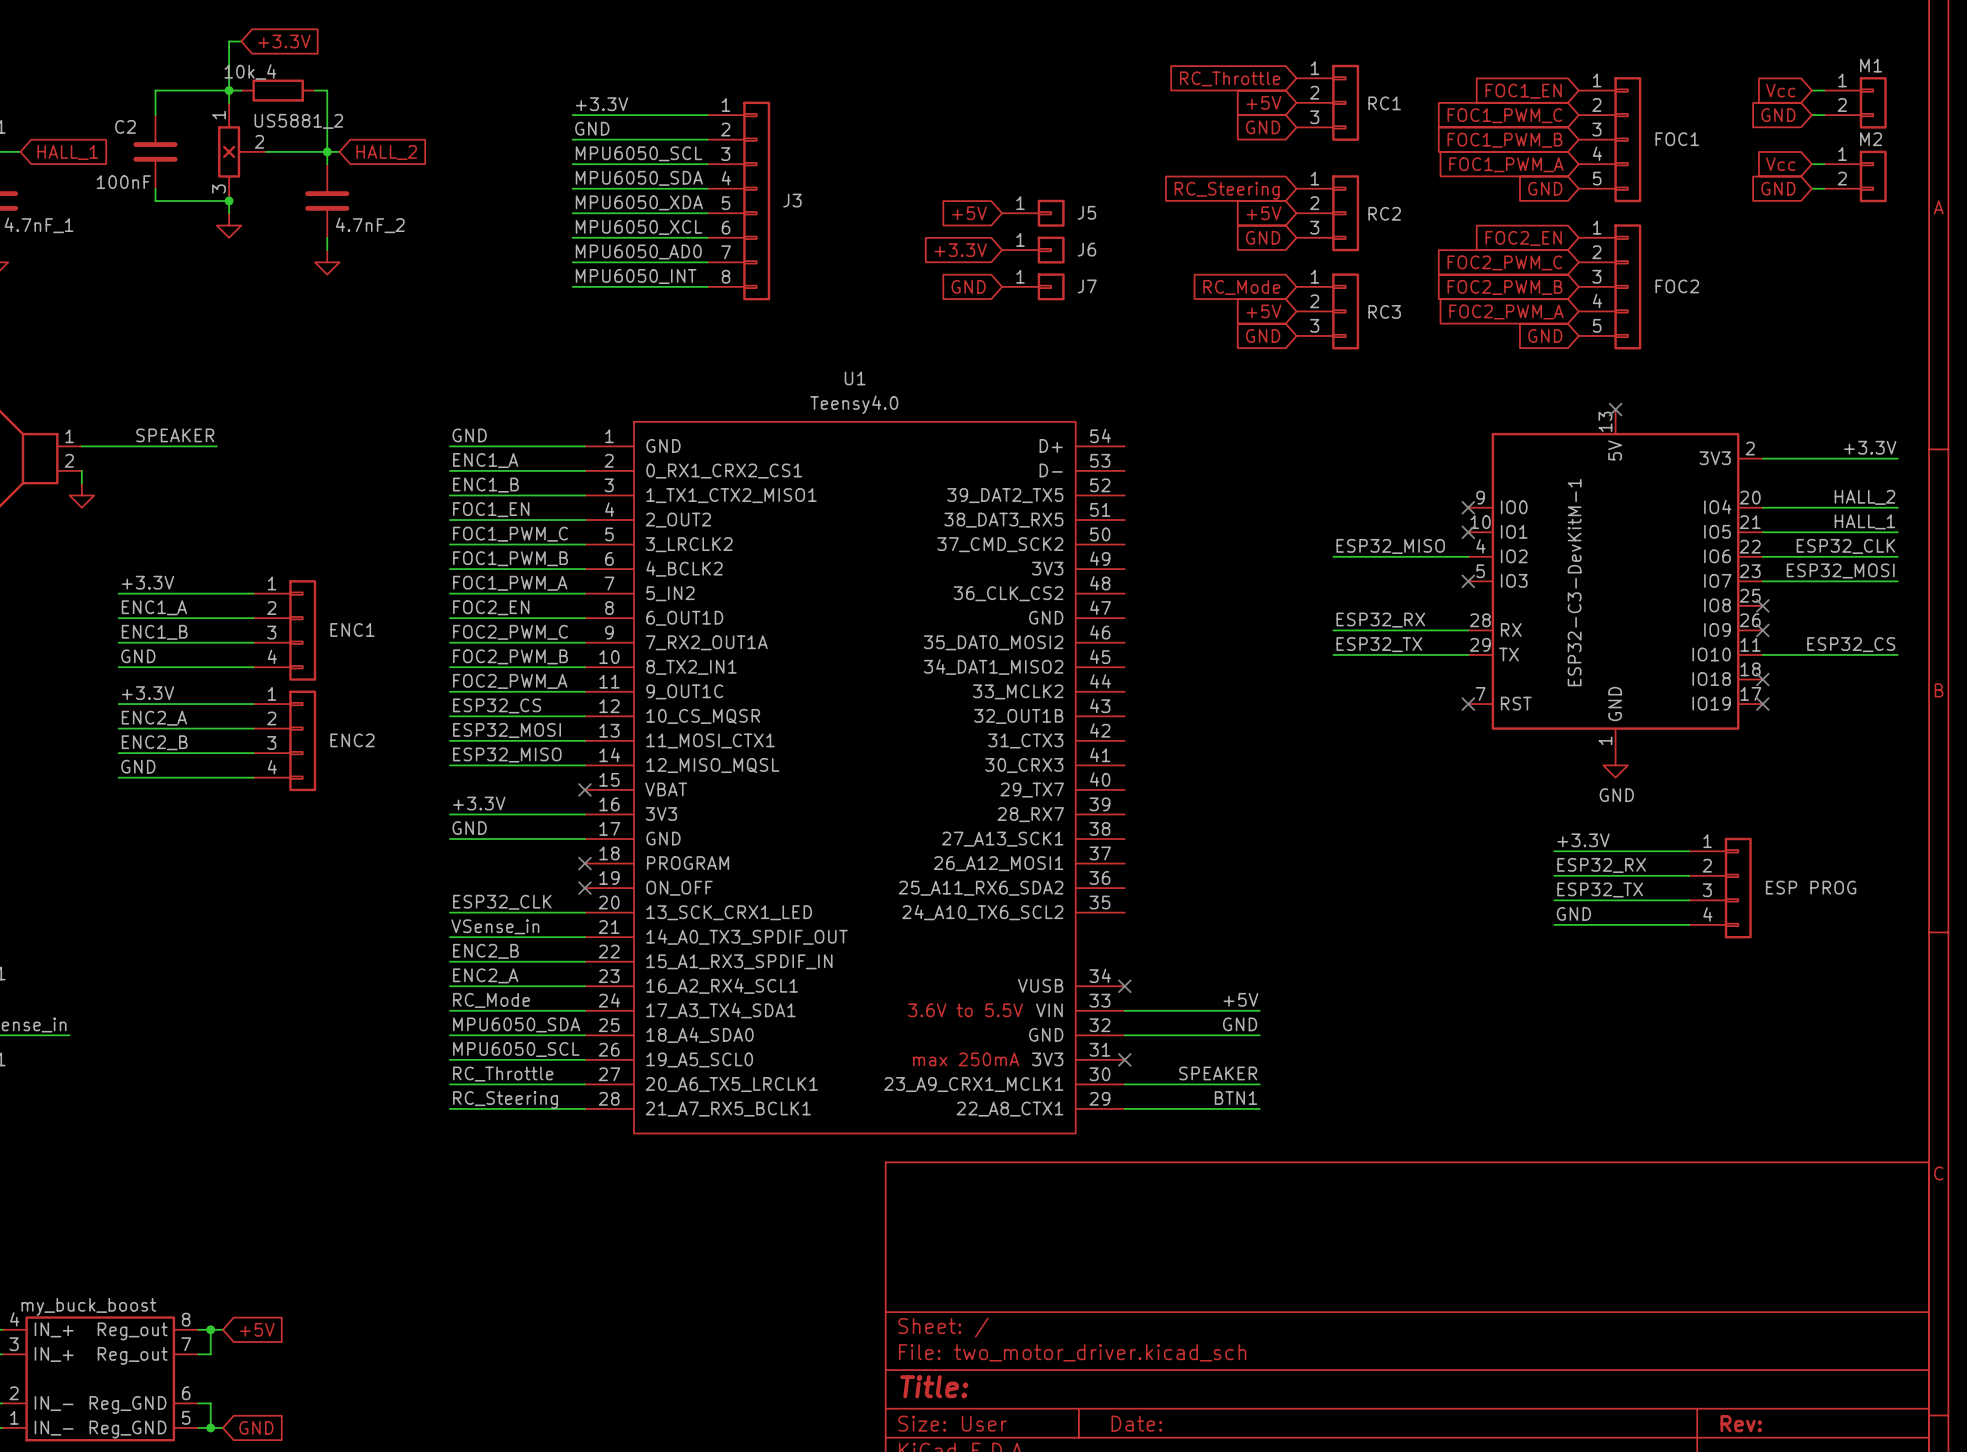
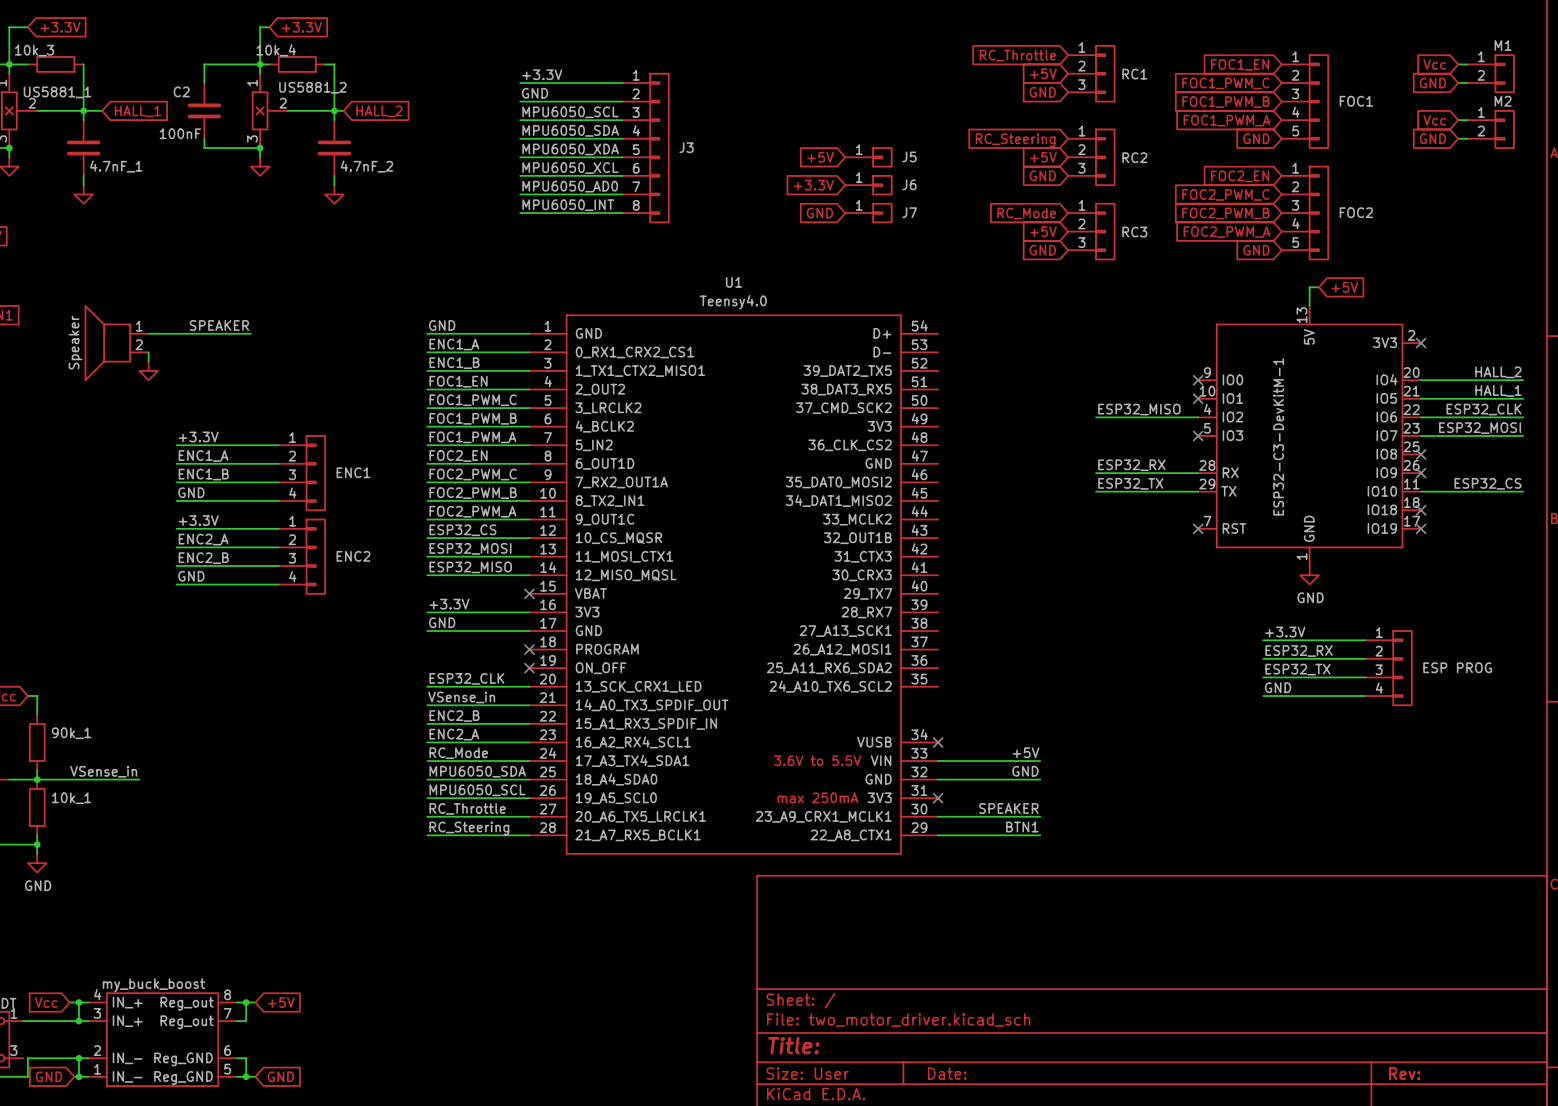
wire: none -> (1318, 287) (1309, 287) (1309, 305)
global label: none -> +5V (1344, 287)
no-connect mark: (1615, 409) -> none
label: +3.3V (1870, 447) -> none
wire: (1762, 458) (1897, 458) -> none
no-connect mark: none -> (1421, 343)

